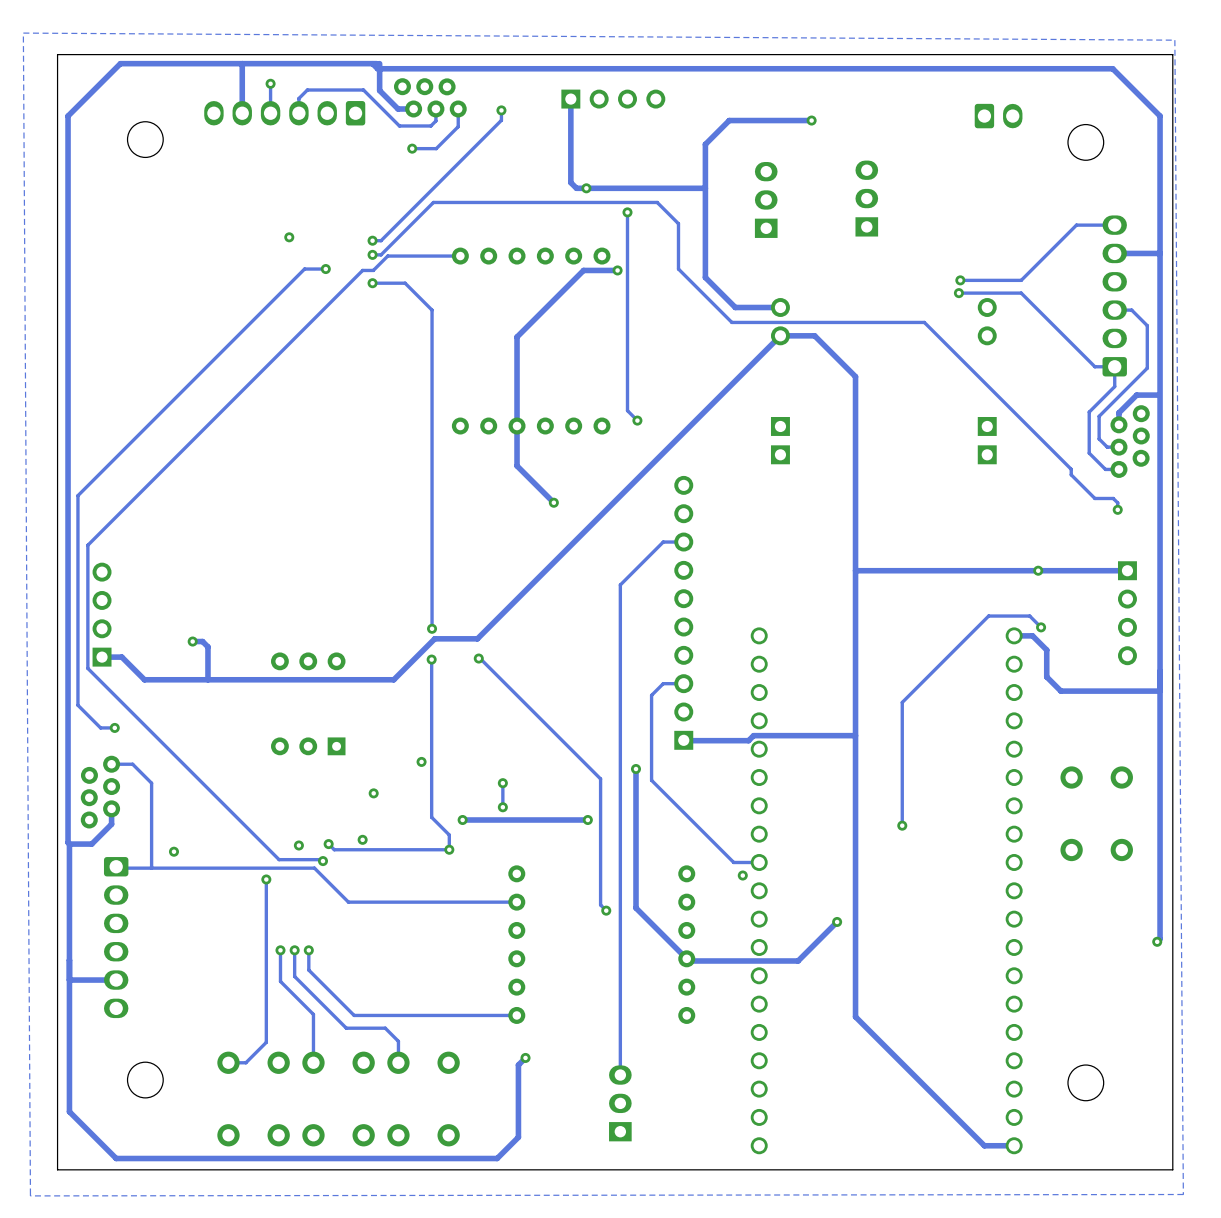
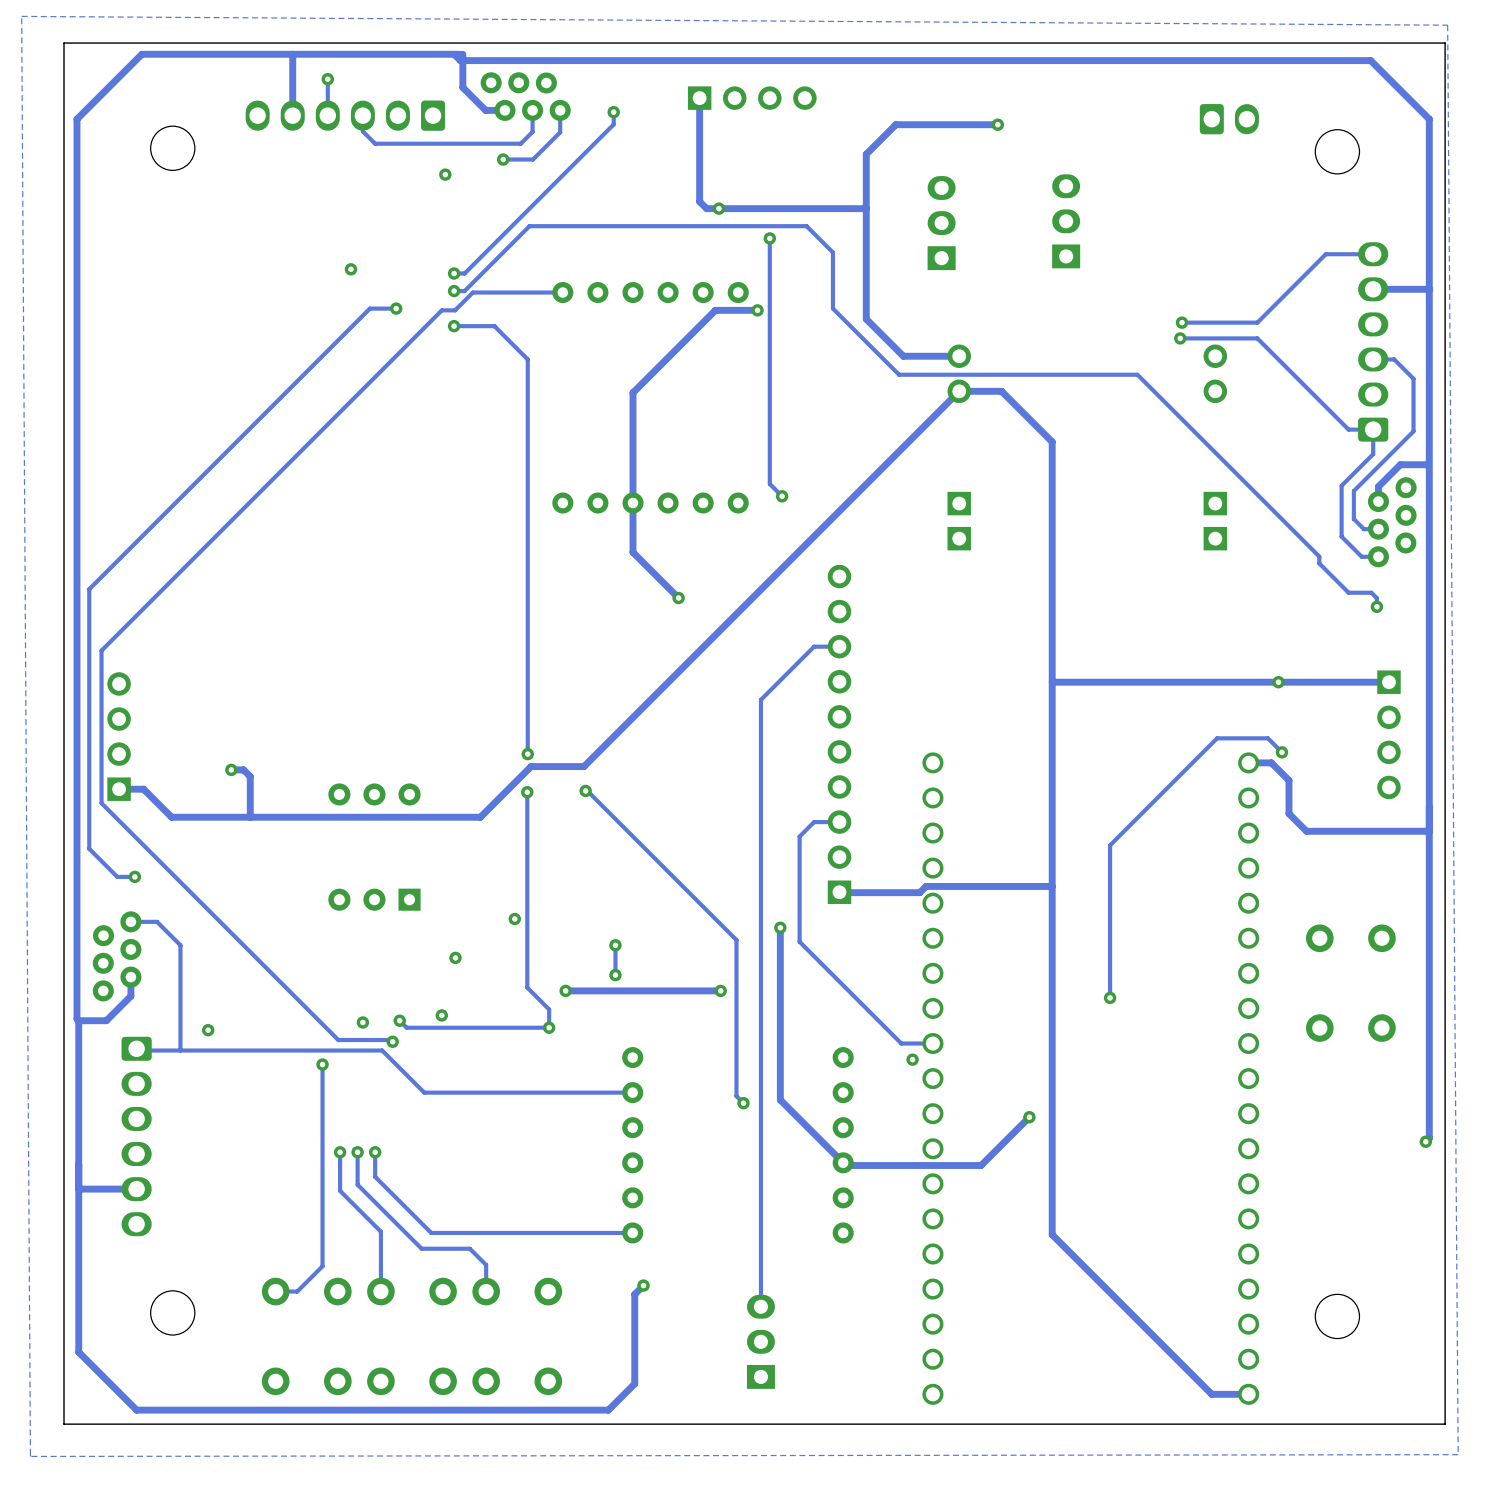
track: (298, 113) (298, 98) (307, 90) (363, 90) (399, 125) (430, 125) (435, 120) -> (362, 115) (362, 131) (375, 143) (520, 143) (532, 131) (532, 125)
via: none -> (445, 174)

